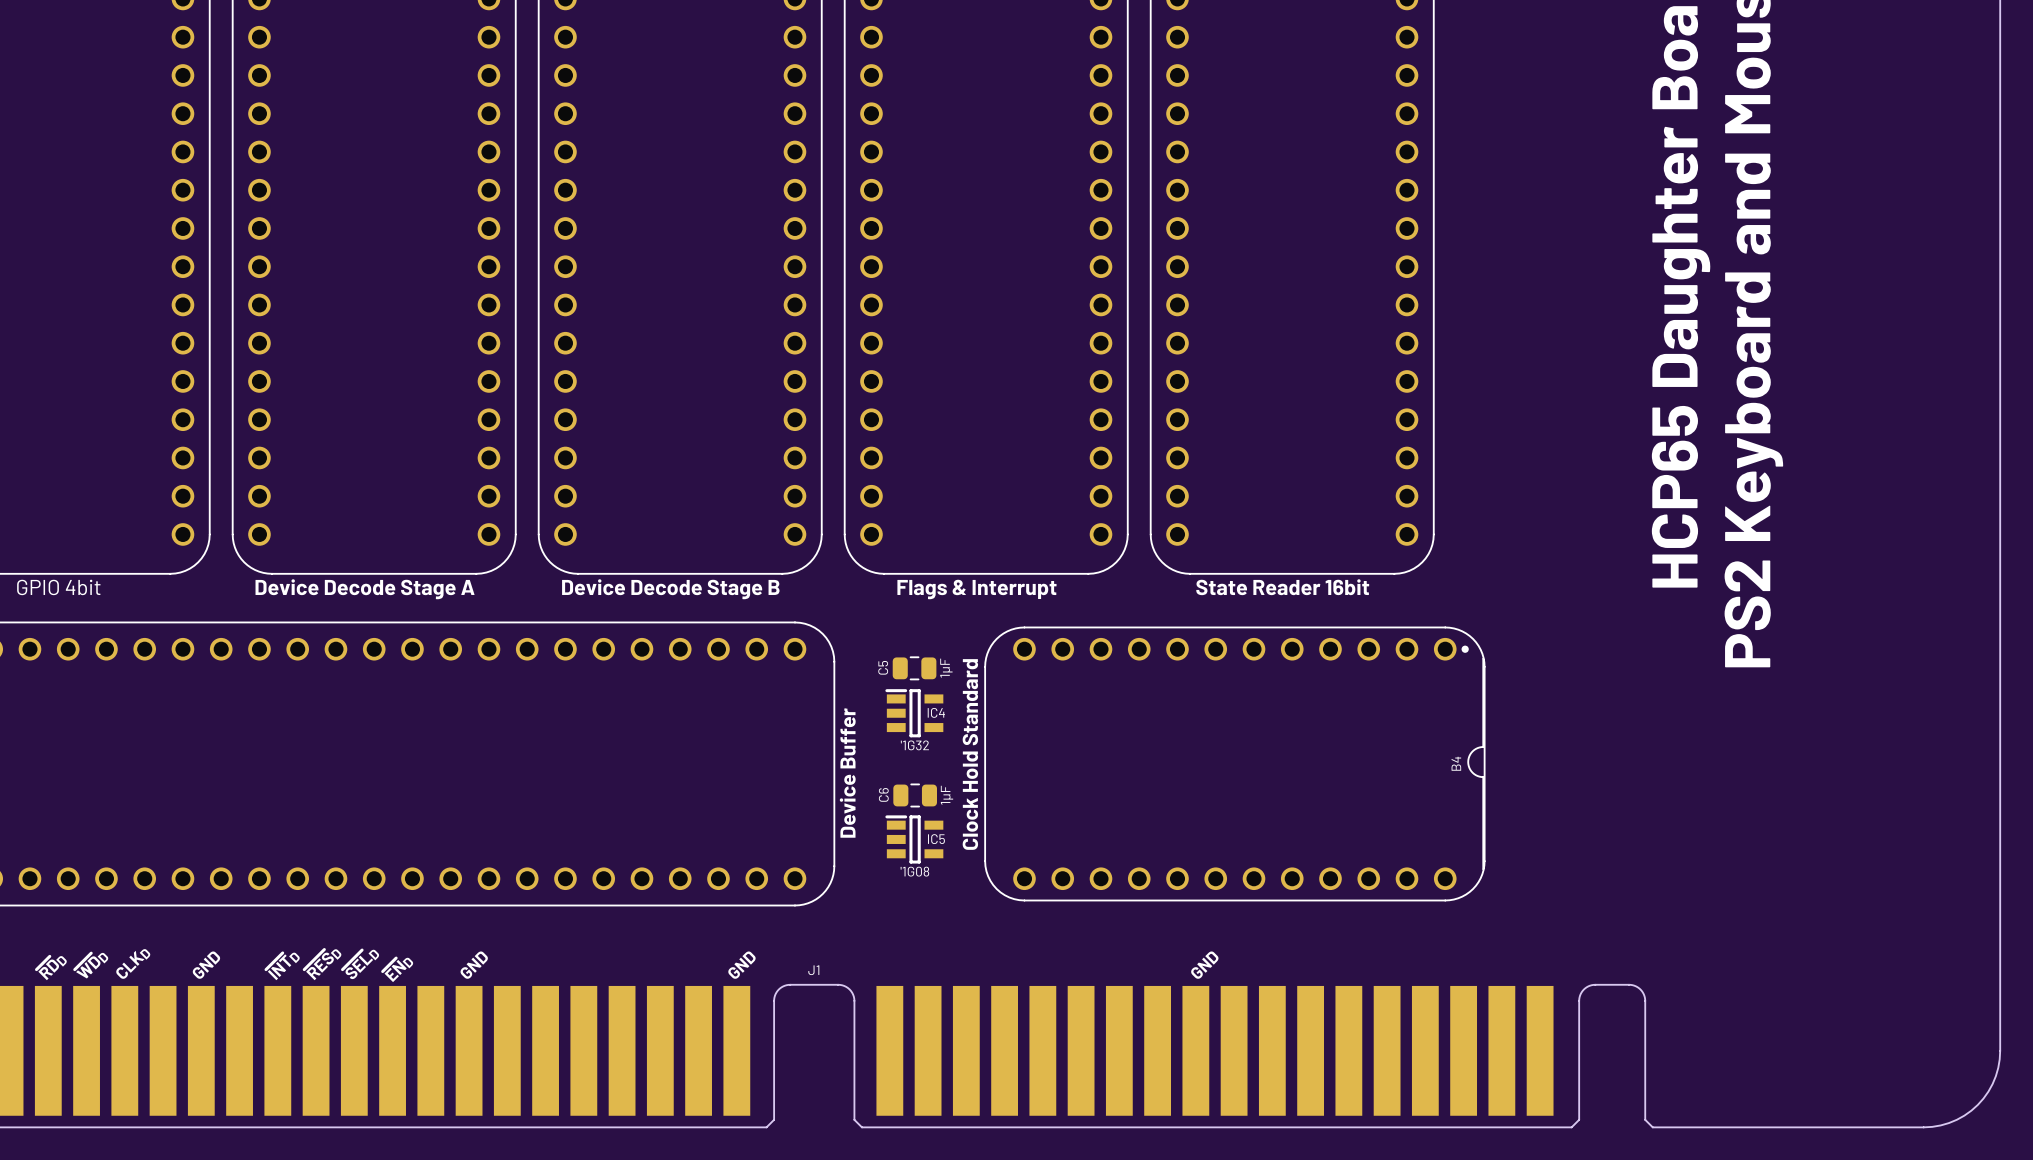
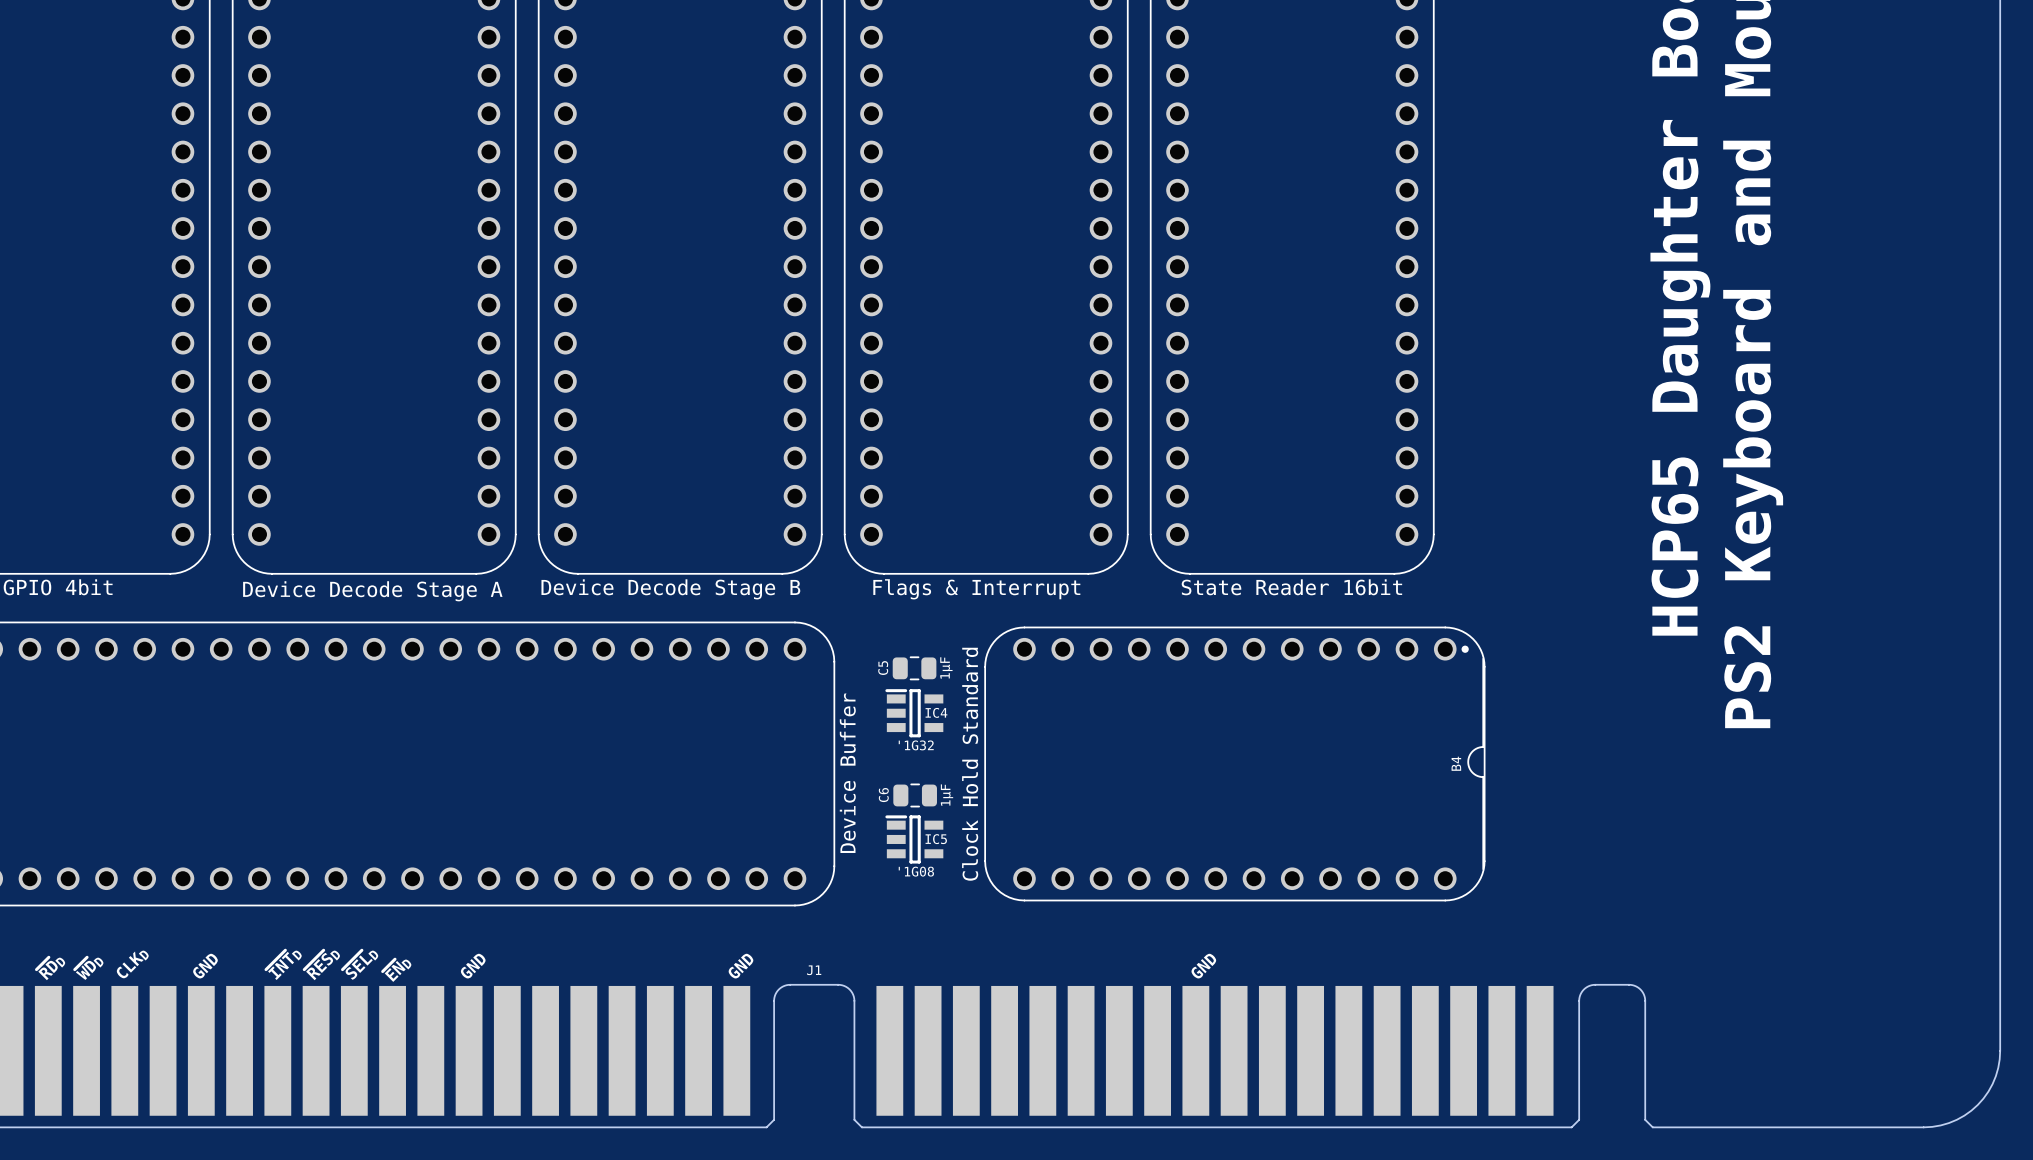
part text: State Reader 16bit (1282, 587) -> none
part text: none -> State Reader 16bit (1291, 587)
part text: Device Decode Stage A (365, 589) -> none
part text: Device Decode Stage B (670, 589) -> none
part text: none -> Device Decode Stage B (670, 589)
part text: Flags & Interrupt (976, 589) -> none
part text: none -> Flags & Interrupt (976, 589)
part text: none -> Device Decode Stage A (372, 591)
B4 footprint: [984, 626, 1486, 902] -> [984, 626, 1486, 902]
B4 text: none -> Clock Hold Standard (970, 764)
part text: Device Buffer (847, 772) -> none
part text: none -> Device Buffer (847, 773)

